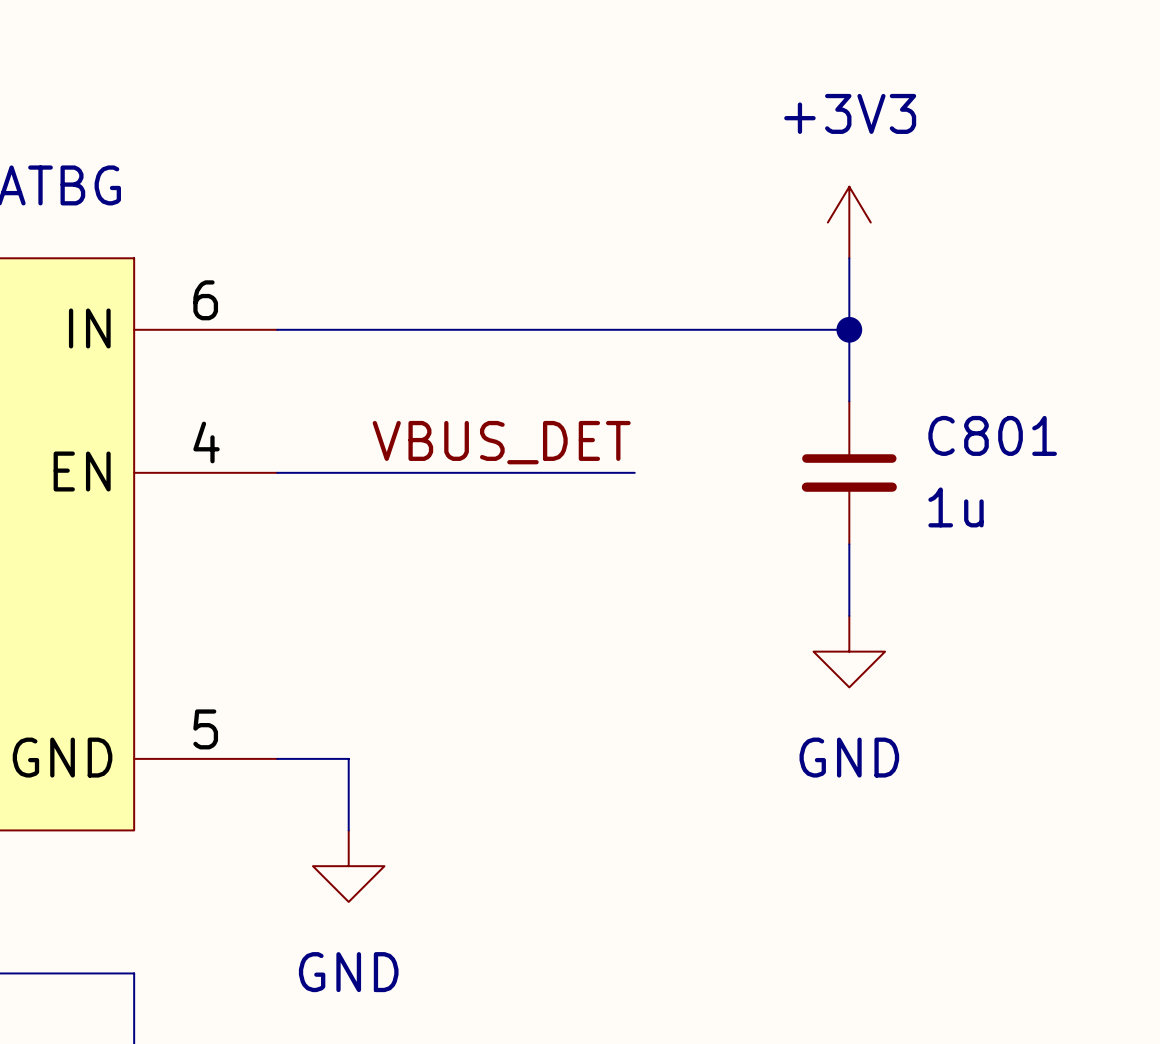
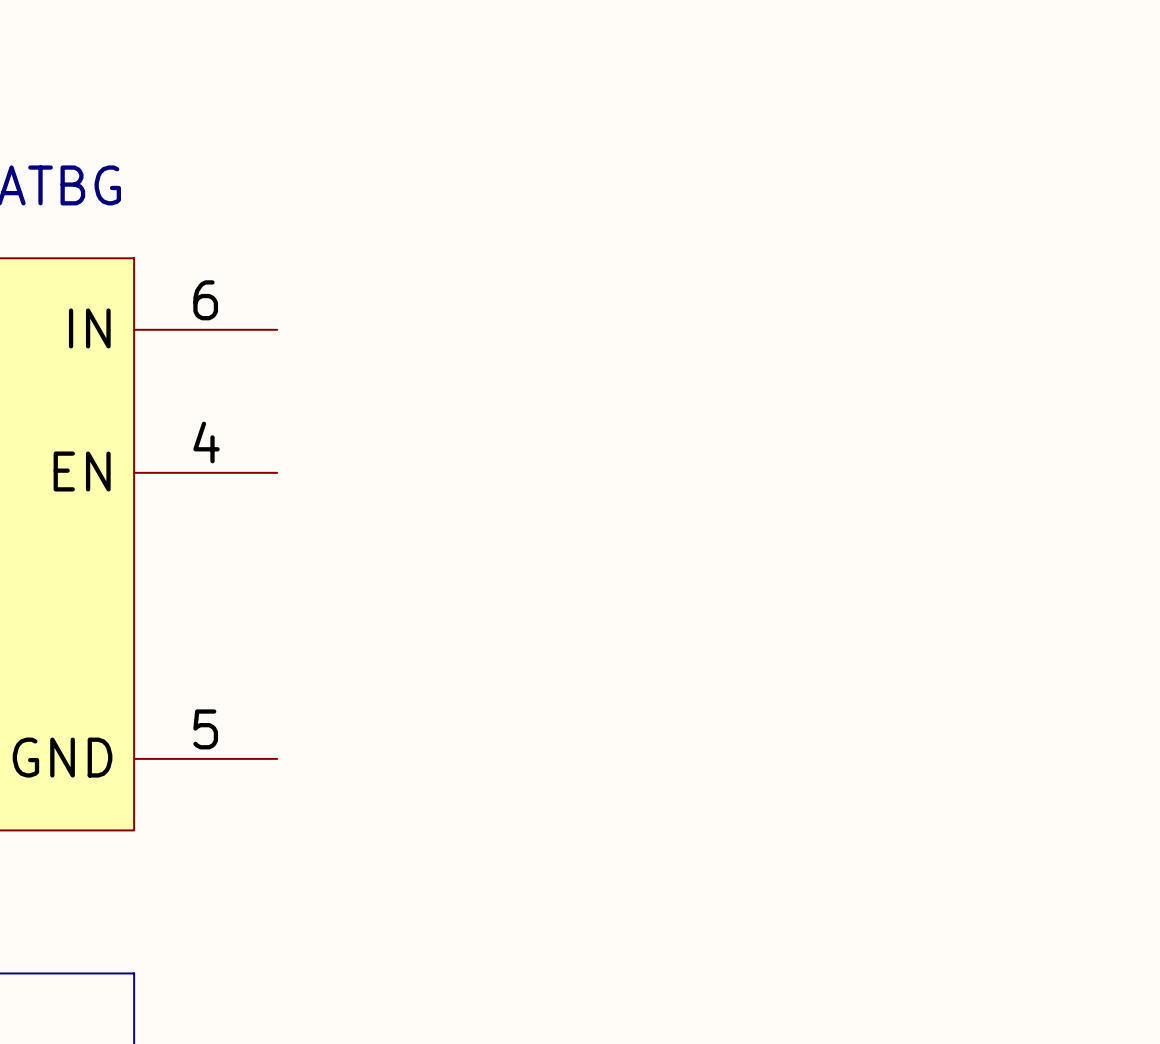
power symbol: +3V3 (849, 222) -> none
wire: (849, 258) (849, 401) -> none
wire: (277, 329) (849, 329) -> none
junction: (849, 329) -> none
label: VBUS_DET (501, 442) -> none
wire: (277, 472) (634, 472) -> none
C801: 1u (849, 472) -> none
wire: (849, 544) (849, 615) -> none
power symbol: GND (849, 651) -> none
wire: (277, 758) (348, 758) (348, 830) -> none
power symbol: GND (348, 866) -> none

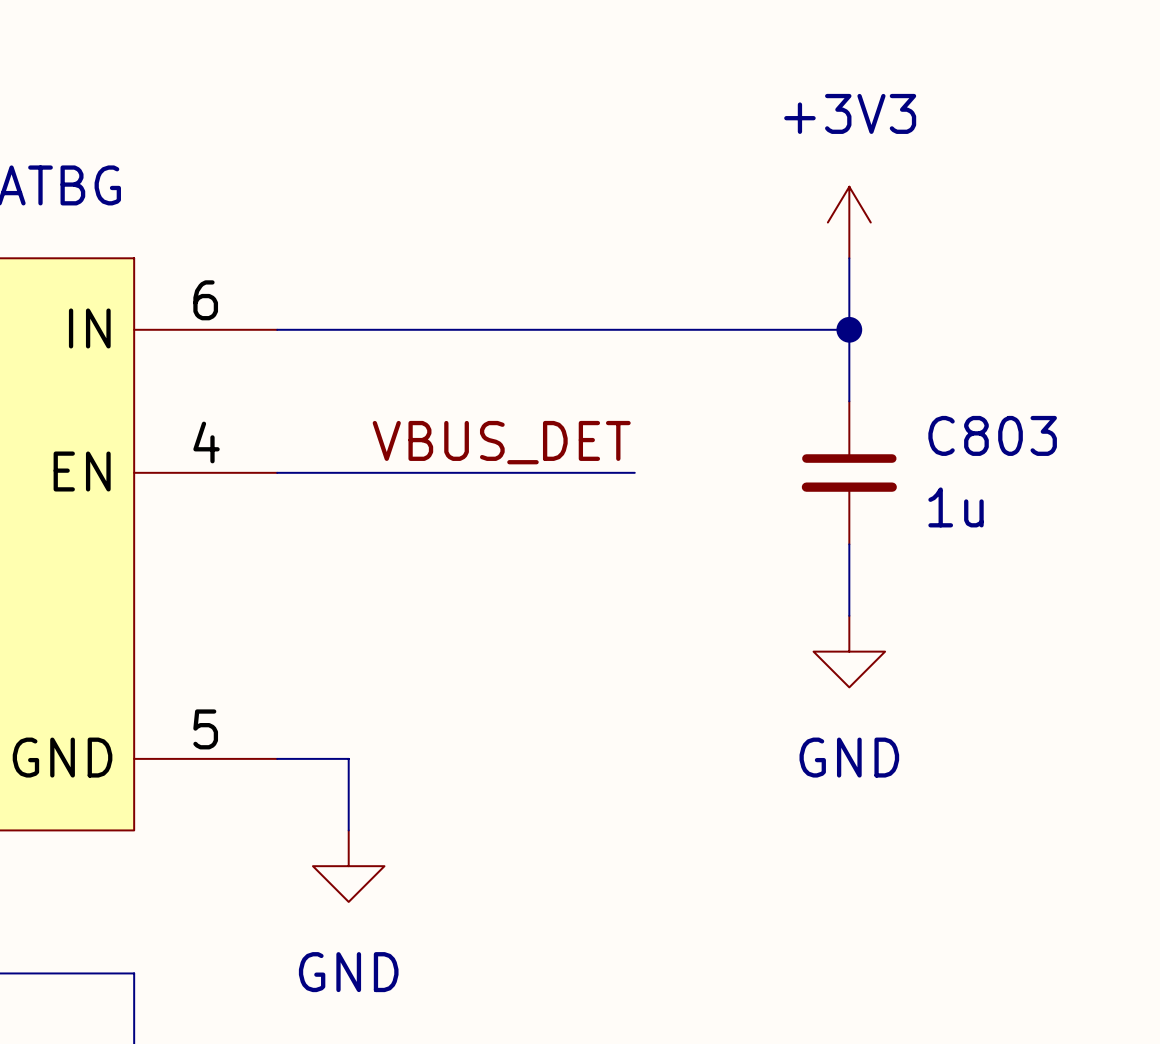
power symbol: none -> +3V3 (849, 222)
wire: none -> (849, 258) (849, 401)
wire: none -> (277, 329) (849, 329)
junction: none -> (849, 329)
label: none -> VBUS_DET (501, 442)
wire: none -> (277, 472) (634, 472)
C803: none -> 1u (849, 472)
wire: none -> (849, 544) (849, 615)
power symbol: none -> GND (849, 651)
wire: none -> (277, 758) (348, 758) (348, 830)
power symbol: none -> GND (348, 866)

